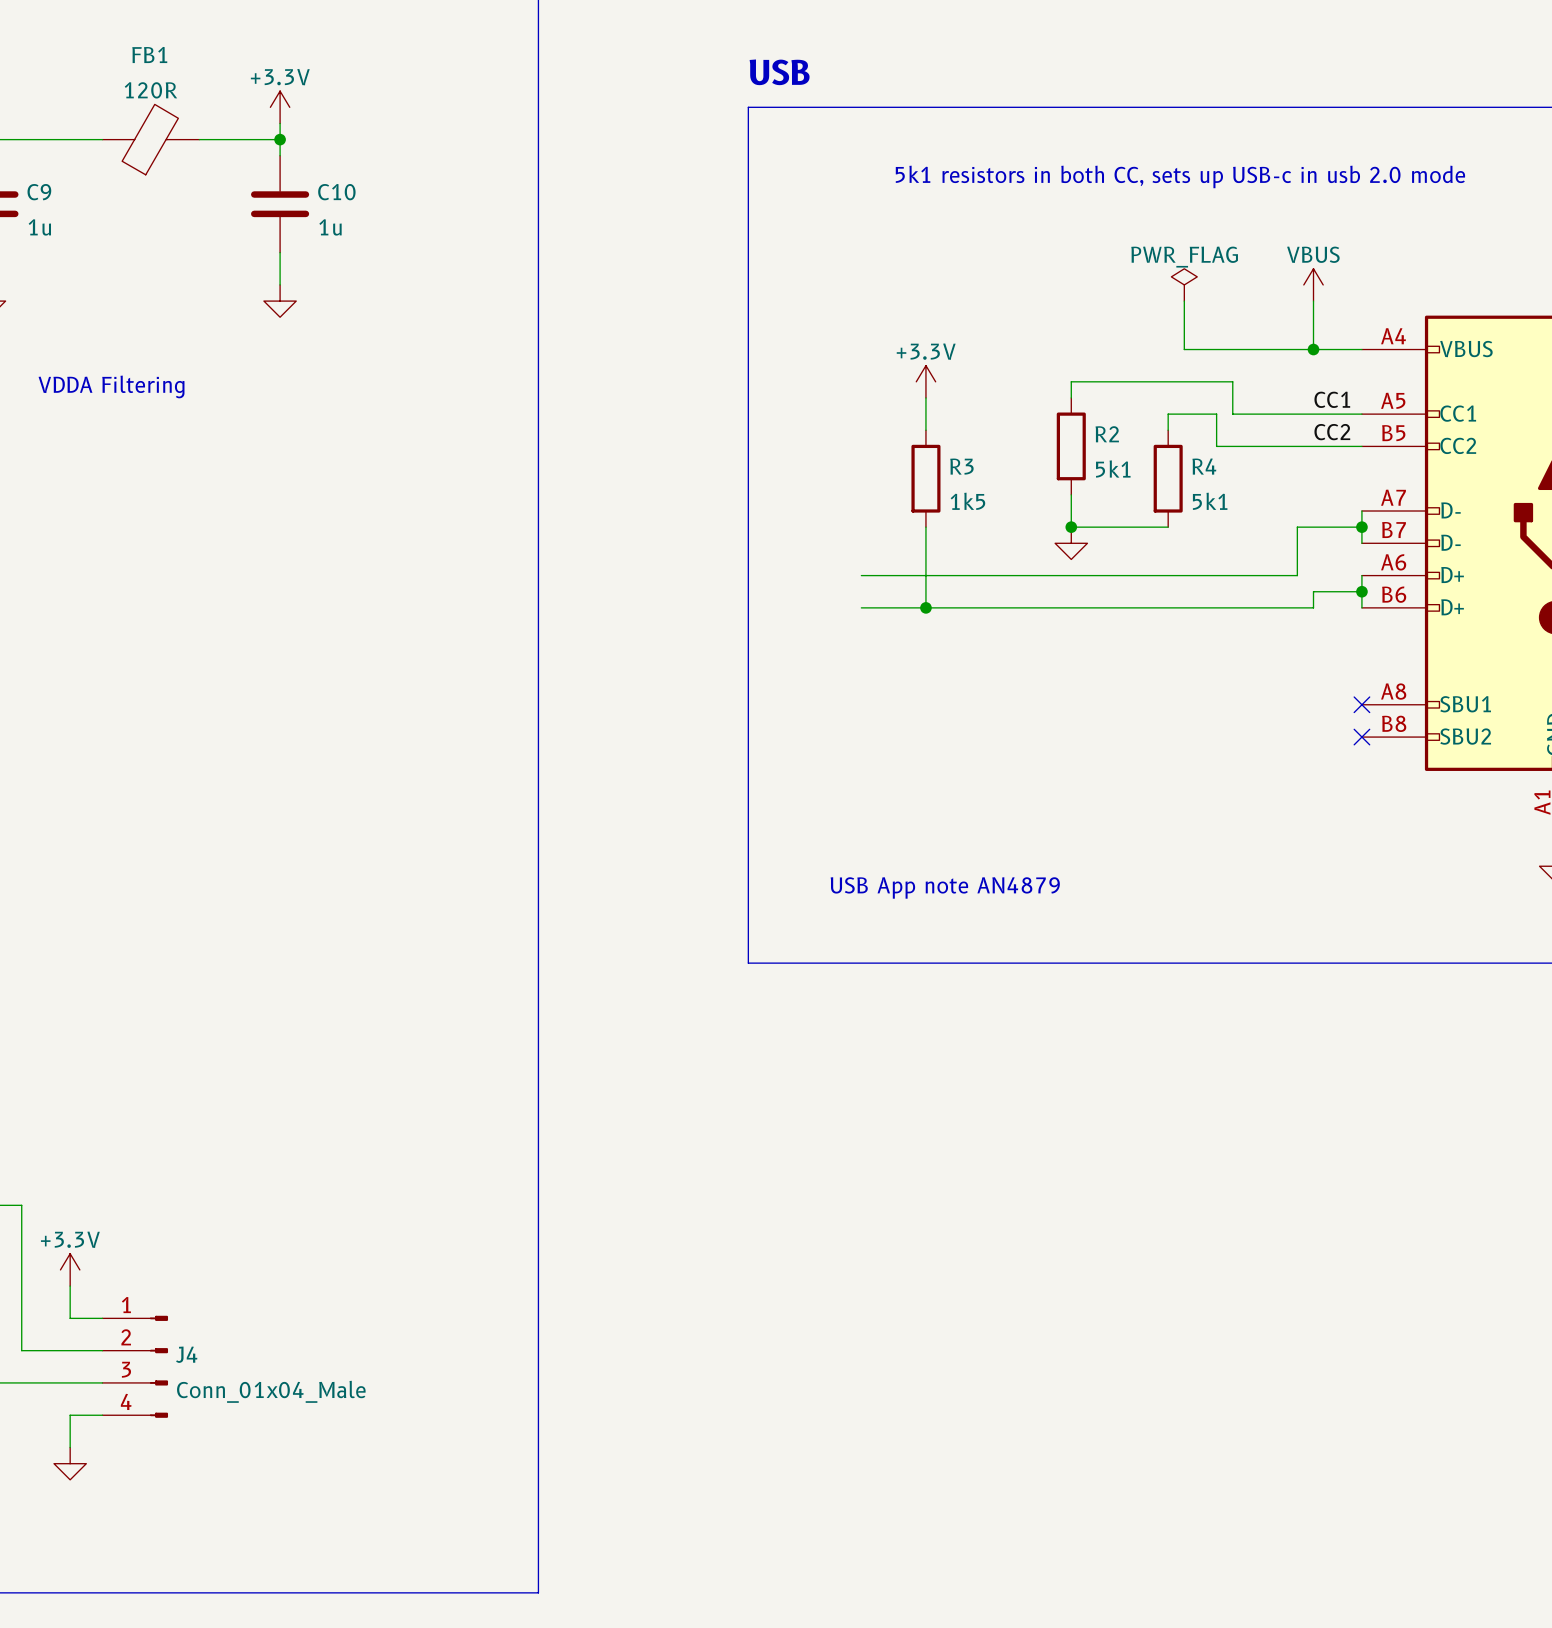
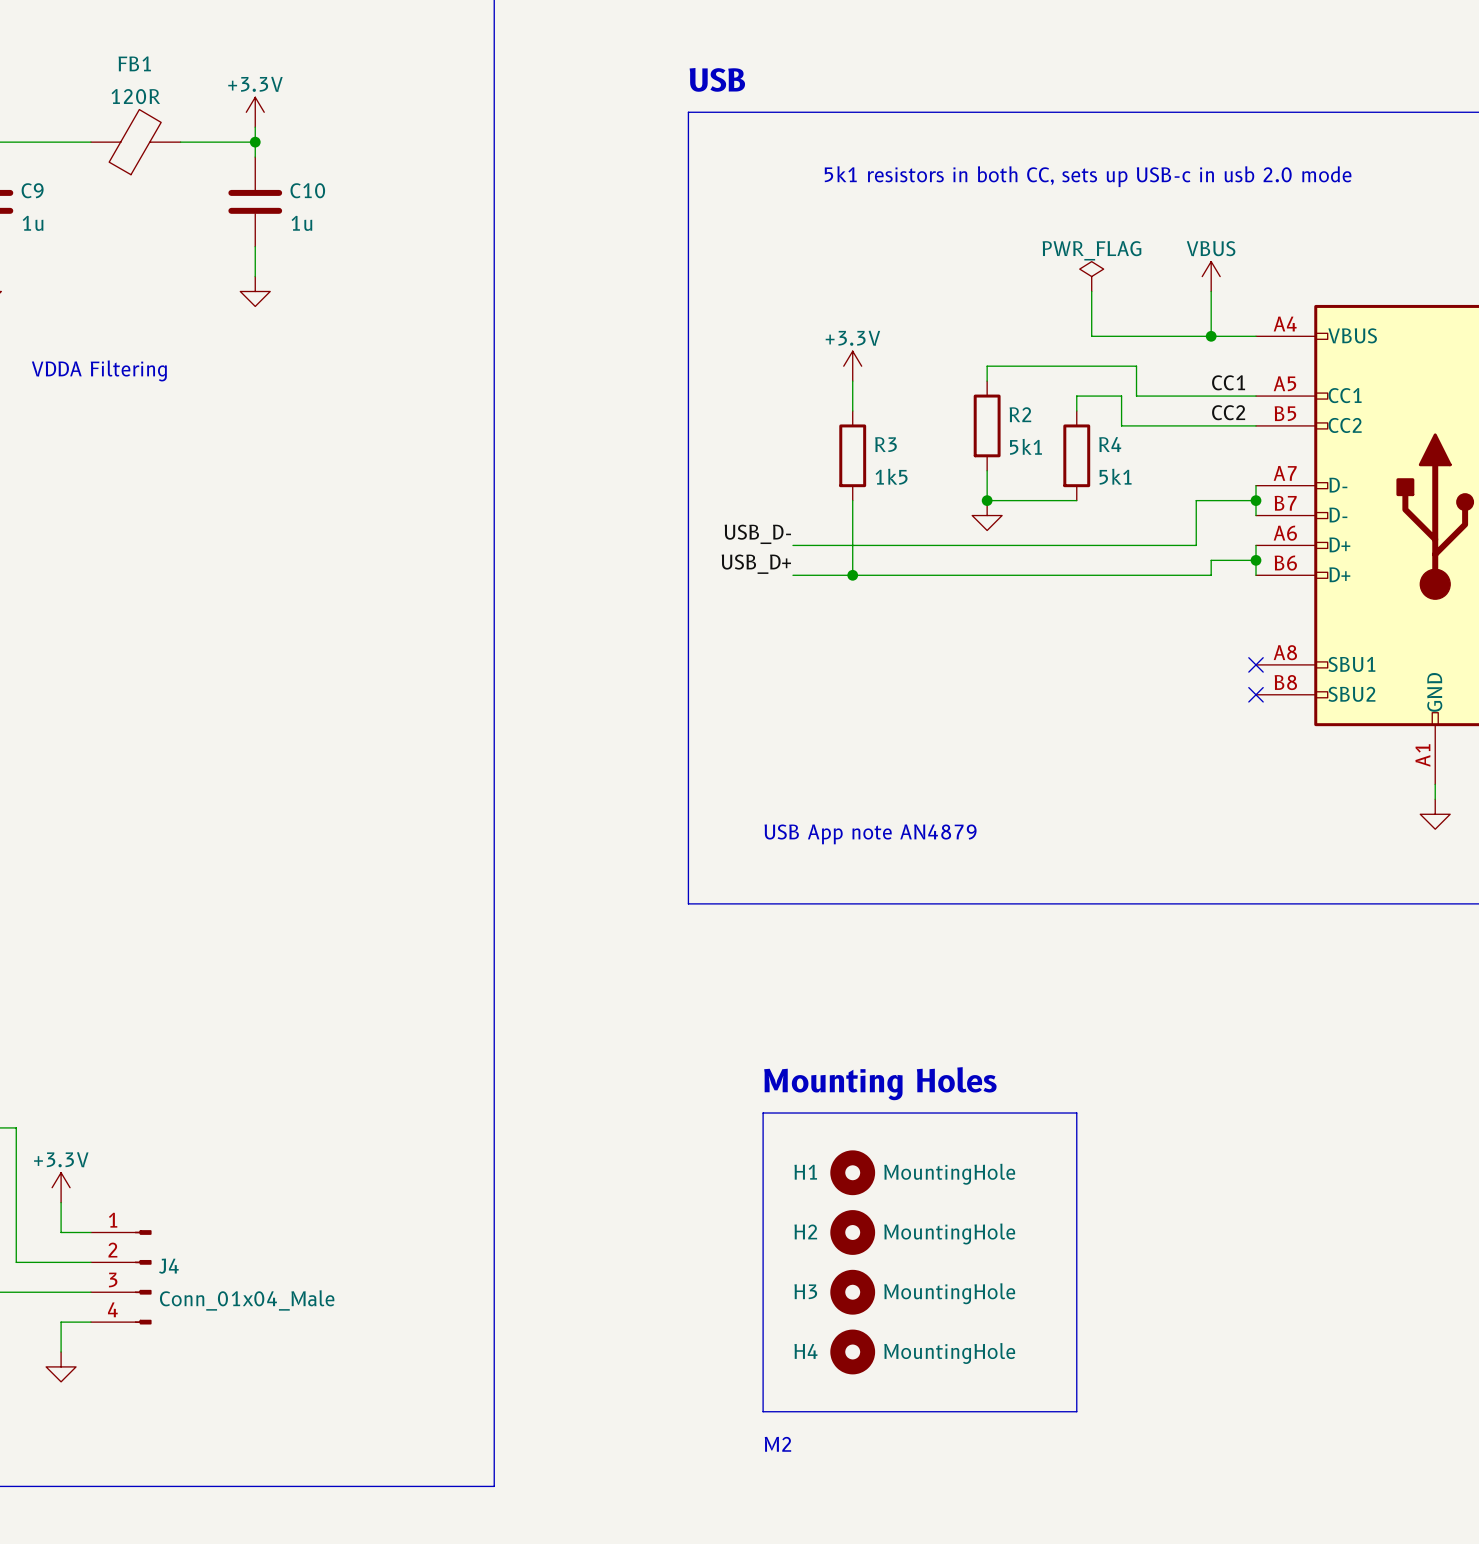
label: none -> USB_D- (757, 534)
label: none -> USB_D+ (756, 564)
text: none -> Mounting Holes (880, 1083)
line: none -> (763, 1113) (763, 1411) (1076, 1411) (1076, 1113) (763, 1113)
H1: none -> MountingHole (852, 1172)
H2: none -> MountingHole (852, 1232)
H3: none -> MountingHole (852, 1292)
H4: none -> MountingHole (852, 1351)
text: none -> M2 (777, 1444)

